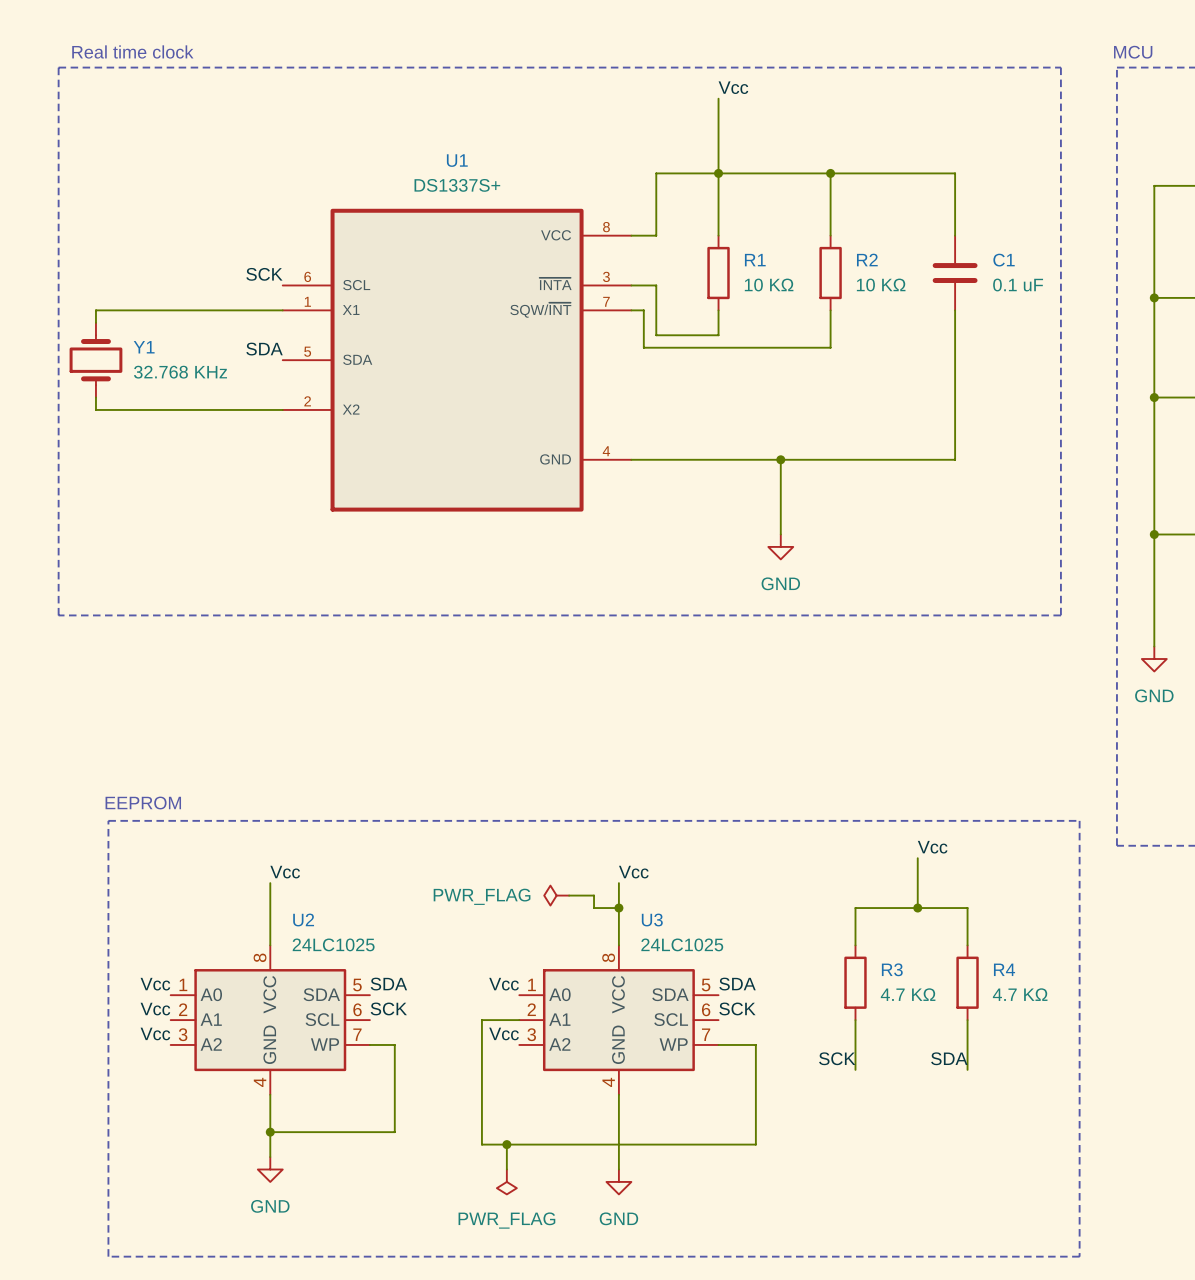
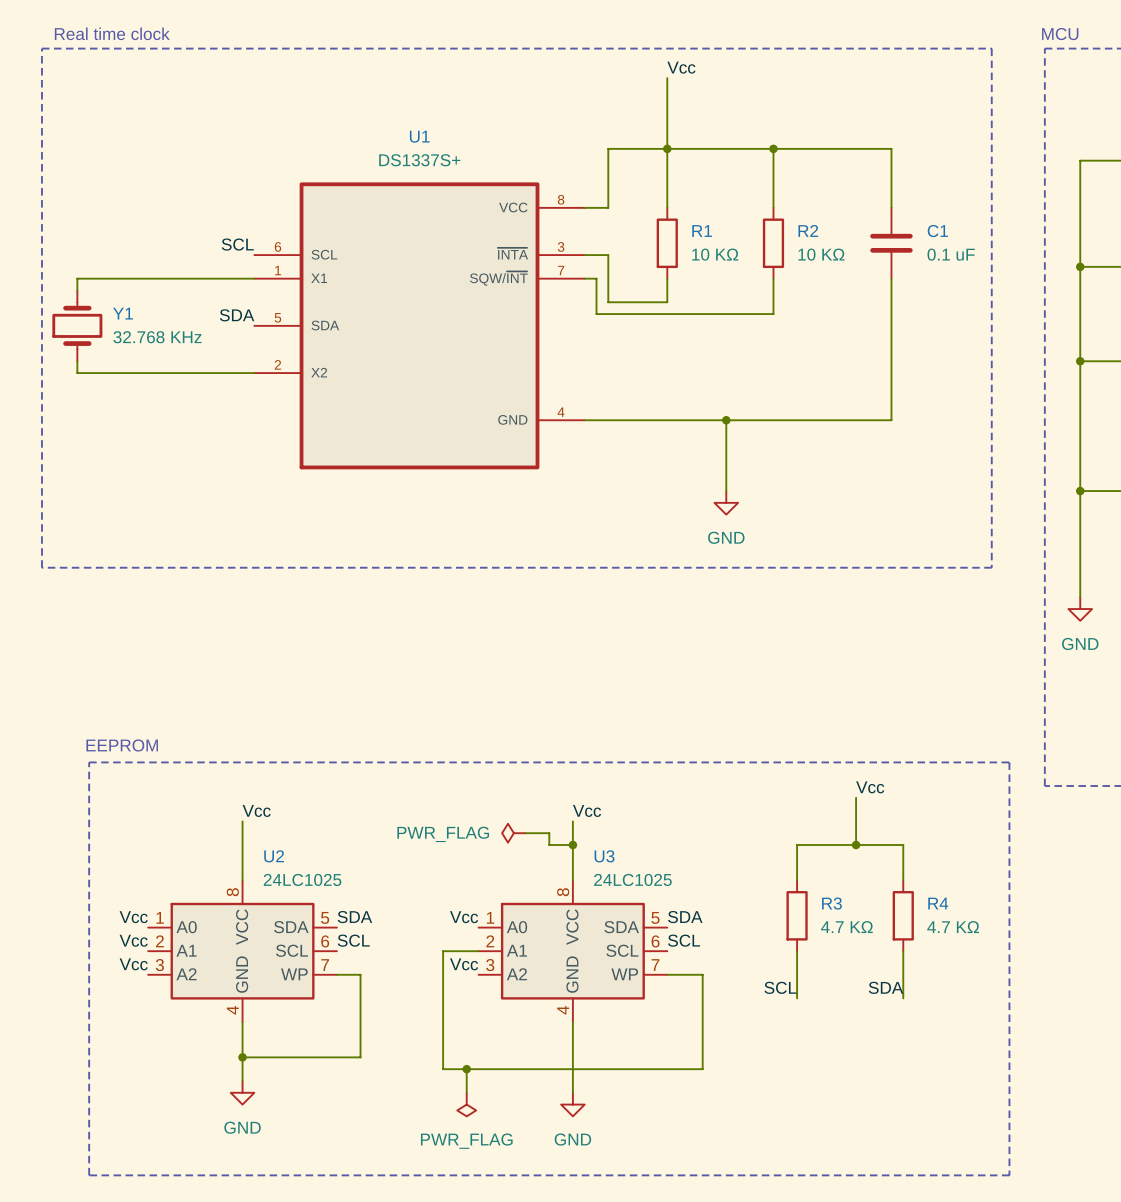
label: SCK (264, 274) -> SCL (237, 244)
label: SCK (388, 1008) -> SCL (353, 940)
label: SCK (737, 1008) -> SCL (684, 940)
label: SCK (837, 1058) -> SCL (780, 987)

